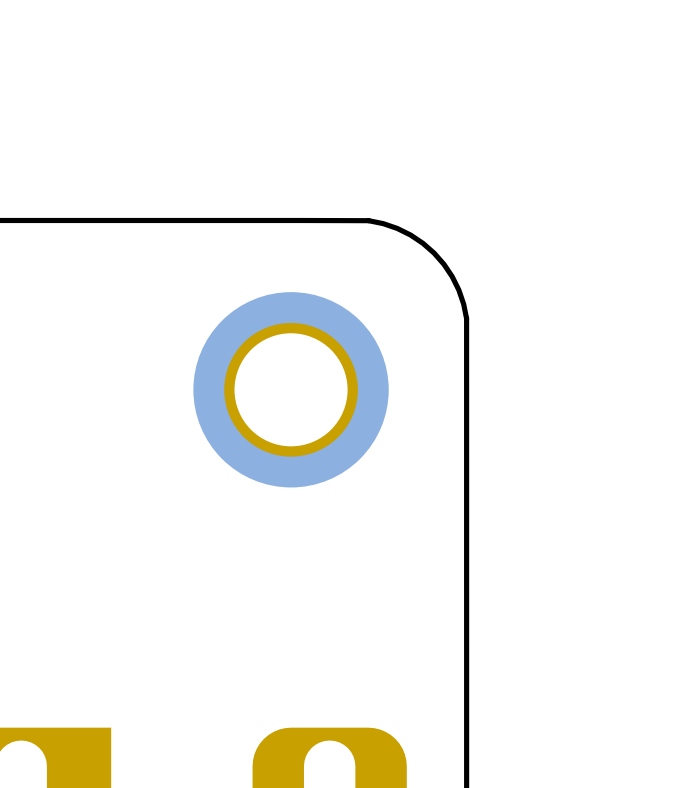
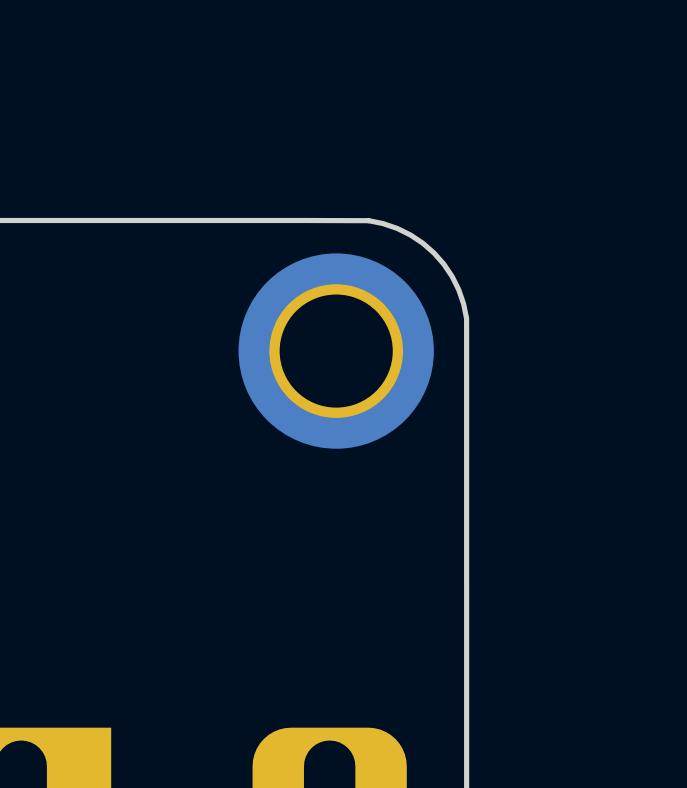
part position: (291, 389) -> (336, 351)

